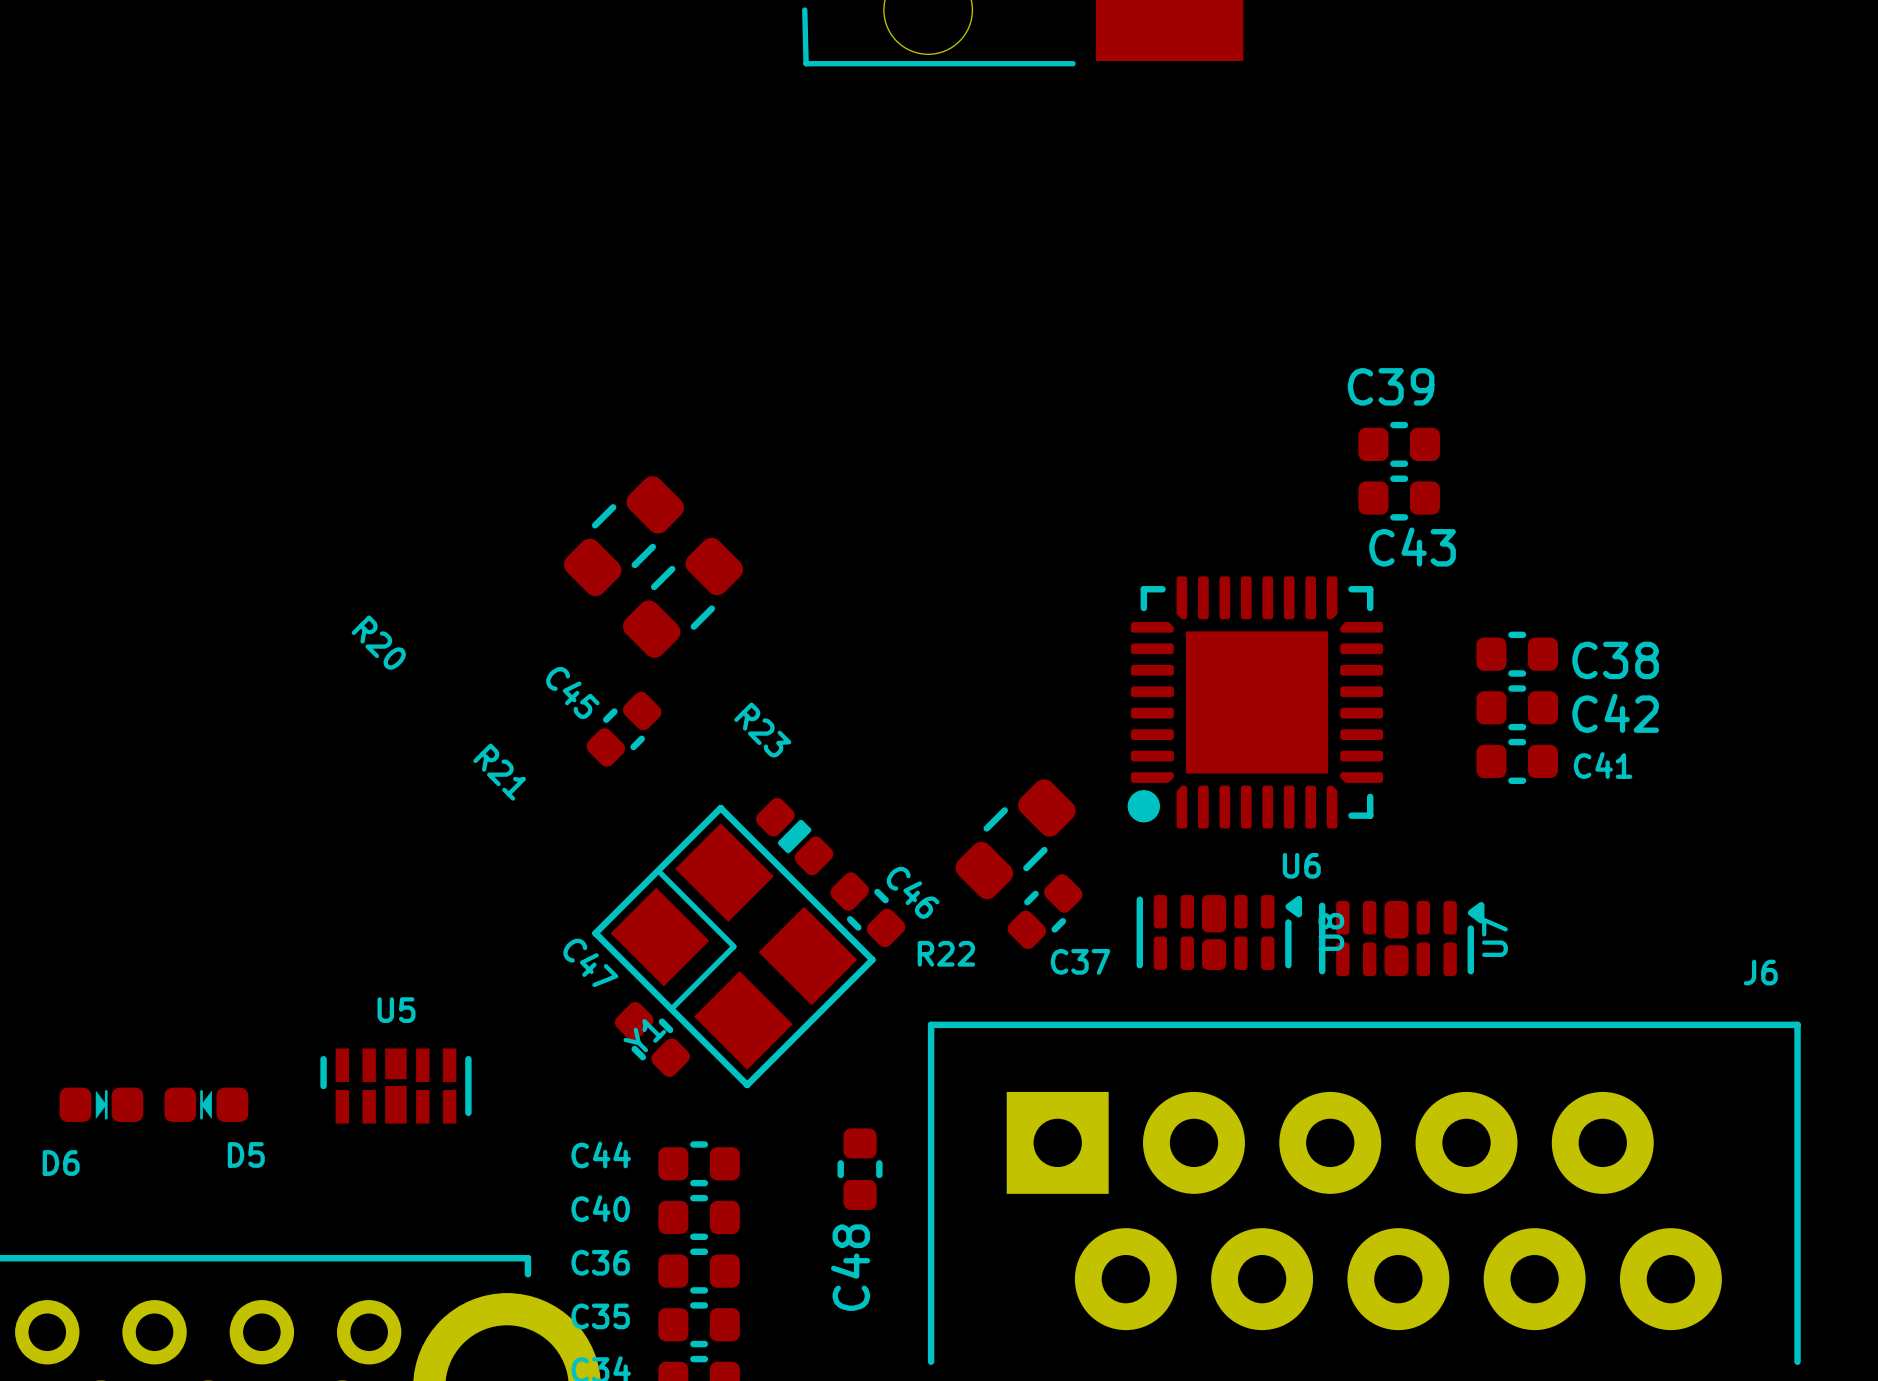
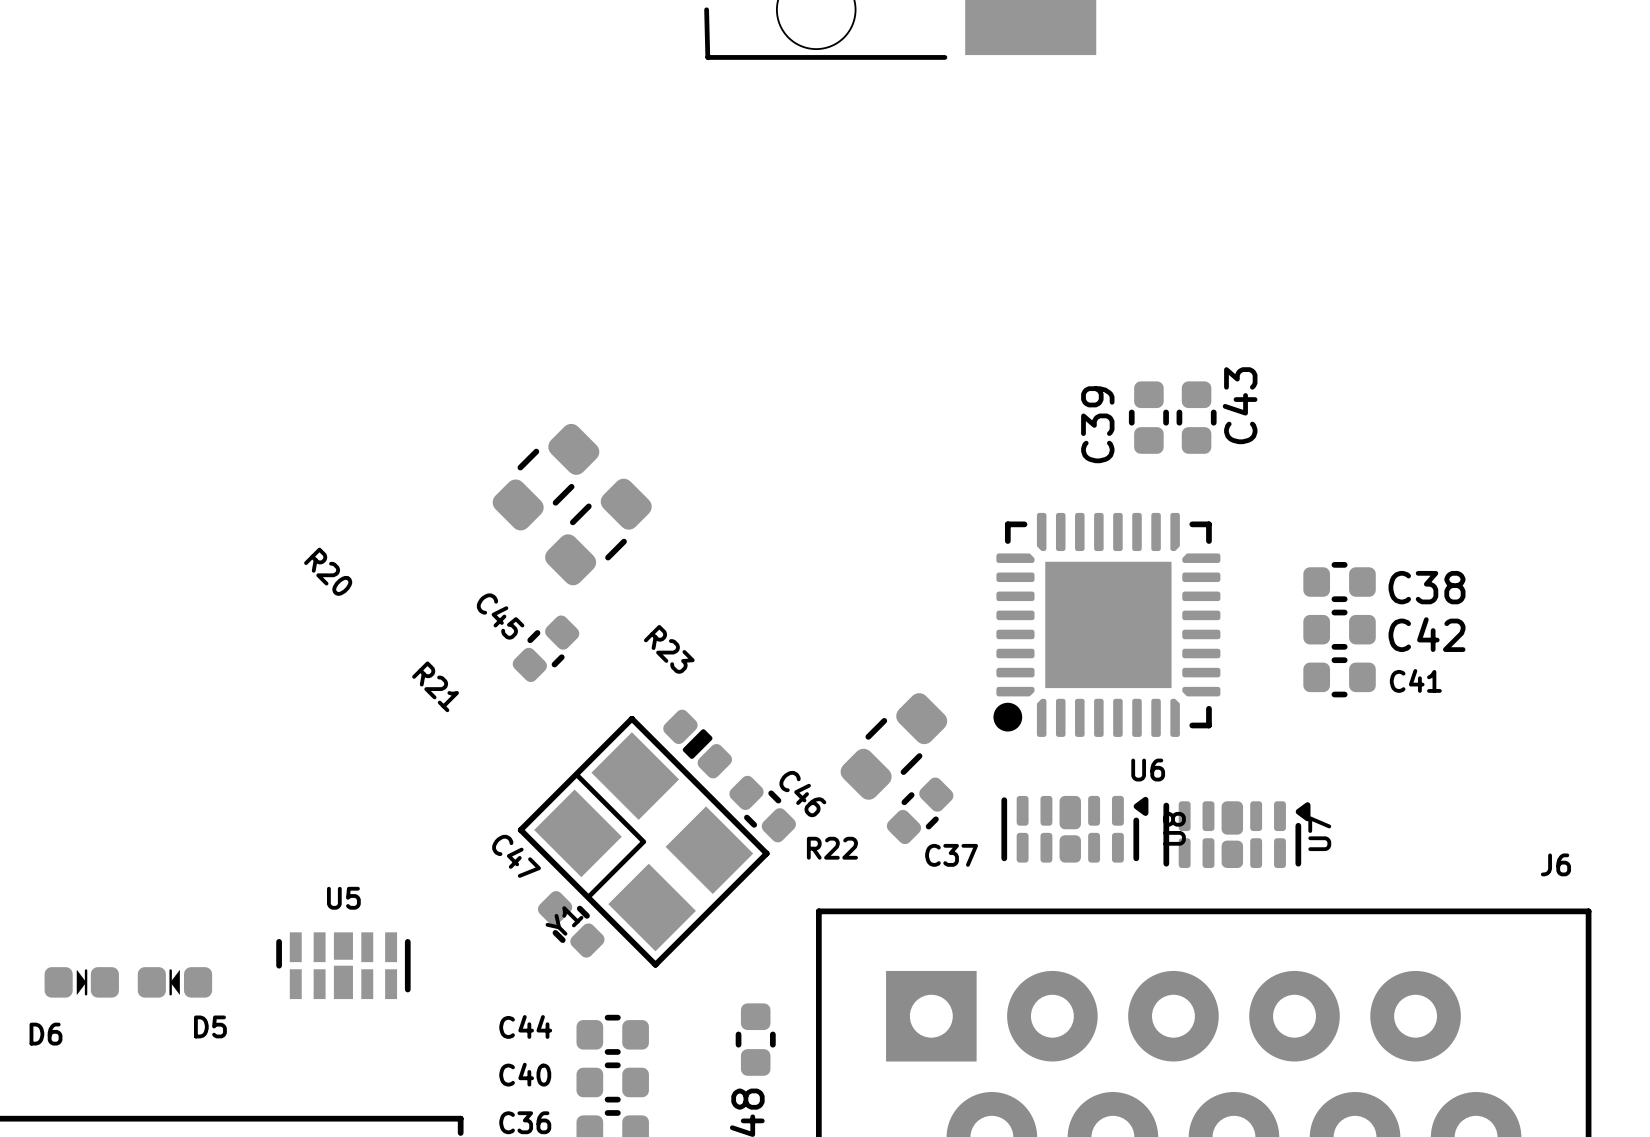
C39 rotation: 0° (1399, 444) -> 90° clockwise (1148, 417)
C39 position: (1399, 444) -> (1148, 417)
C43 rotation: 0° (1399, 498) -> 90° clockwise (1196, 417)
C43 position: (1399, 498) -> (1196, 417)

